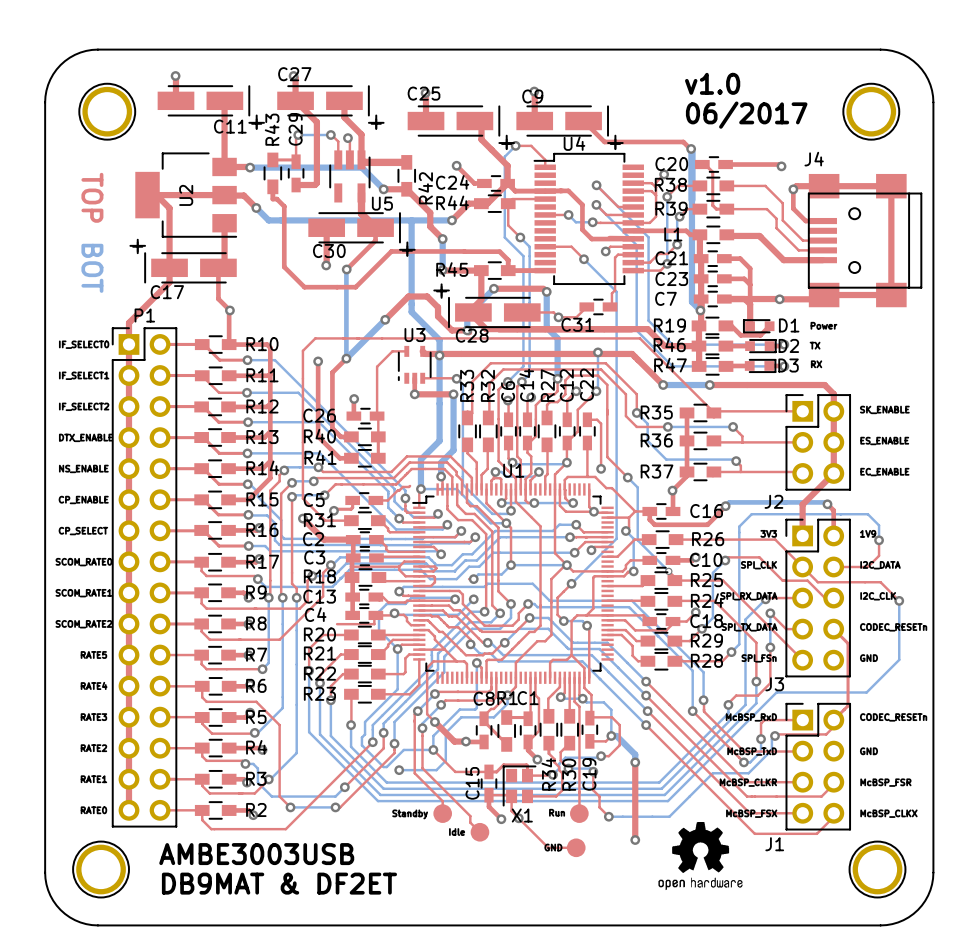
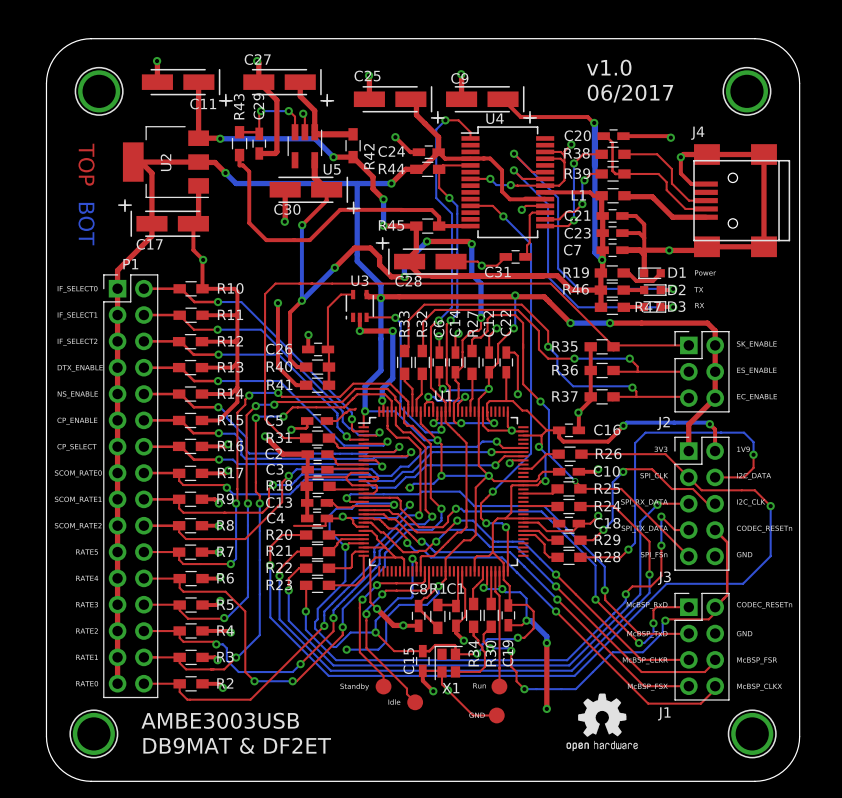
R47 name position: R47 (670, 365) -> R47 (648, 306)

